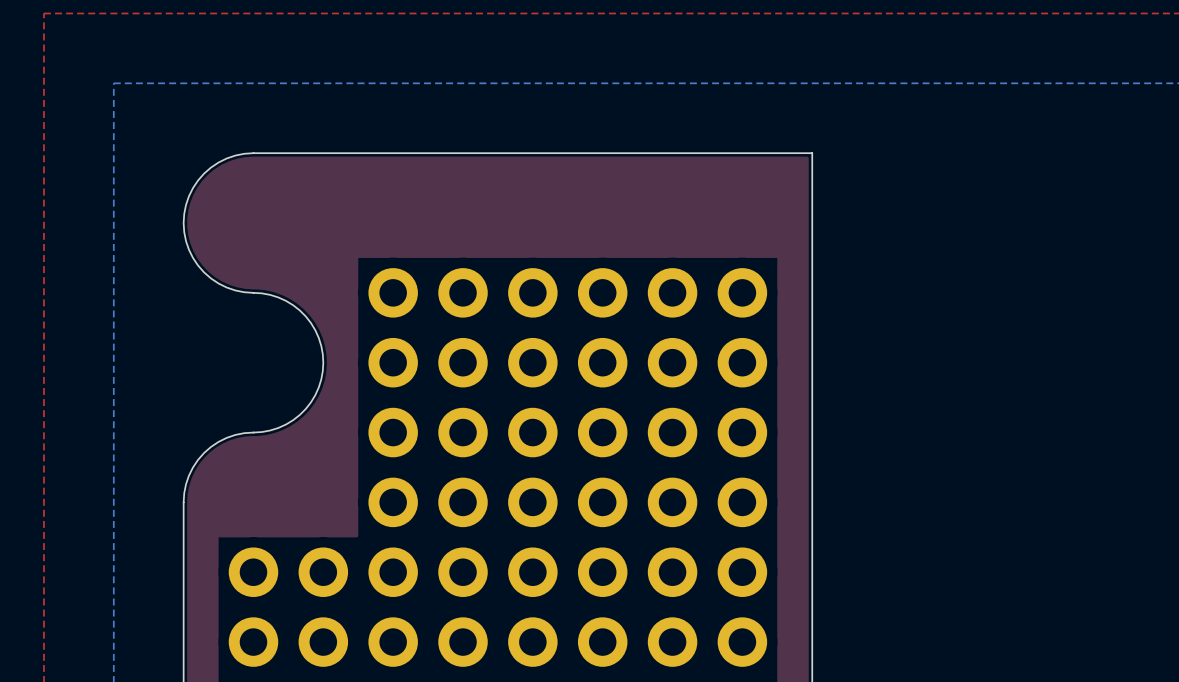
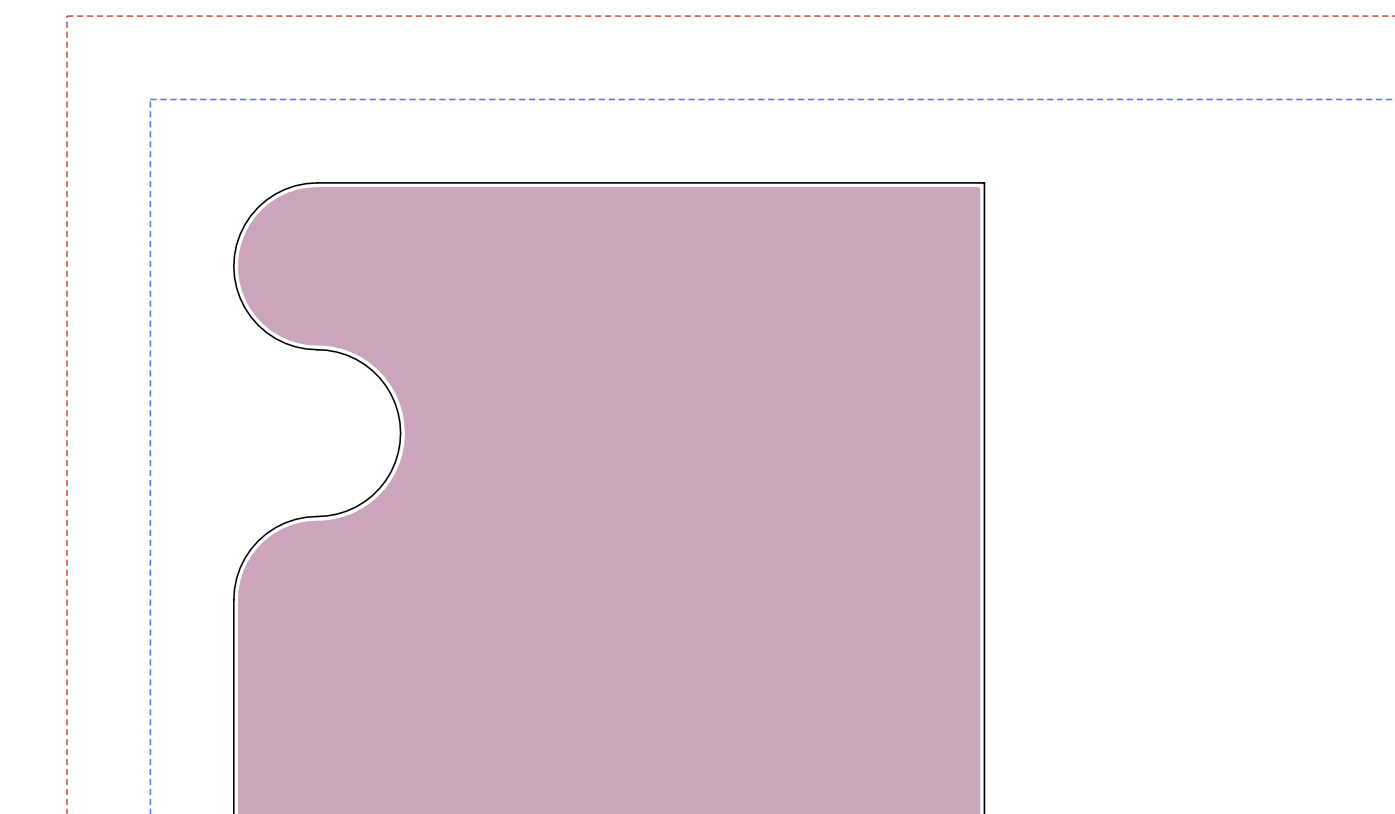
part: (393, 292) -> none
part: (463, 292) -> none
part: (532, 292) -> none
part: (602, 292) -> none
part: (672, 292) -> none
part: (742, 292) -> none
part: (393, 362) -> none
part: (463, 362) -> none
part: (532, 362) -> none
part: (602, 362) -> none
part: (672, 362) -> none
part: (742, 362) -> none
part: (393, 432) -> none
part: (463, 432) -> none
part: (532, 432) -> none
part: (602, 432) -> none
part: (672, 432) -> none
part: (742, 432) -> none
part: (393, 502) -> none
part: (463, 502) -> none
part: (532, 502) -> none
part: (602, 502) -> none
part: (672, 502) -> none
part: (742, 502) -> none
part: (253, 572) -> none
part: (323, 572) -> none
part: (393, 572) -> none
part: (463, 572) -> none
part: (532, 572) -> none
part: (602, 572) -> none
part: (672, 572) -> none
part: (742, 572) -> none
part: (253, 642) -> none
part: (323, 642) -> none
part: (393, 642) -> none
part: (463, 642) -> none
part: (532, 642) -> none
part: (602, 642) -> none
part: (672, 642) -> none
part: (742, 642) -> none

